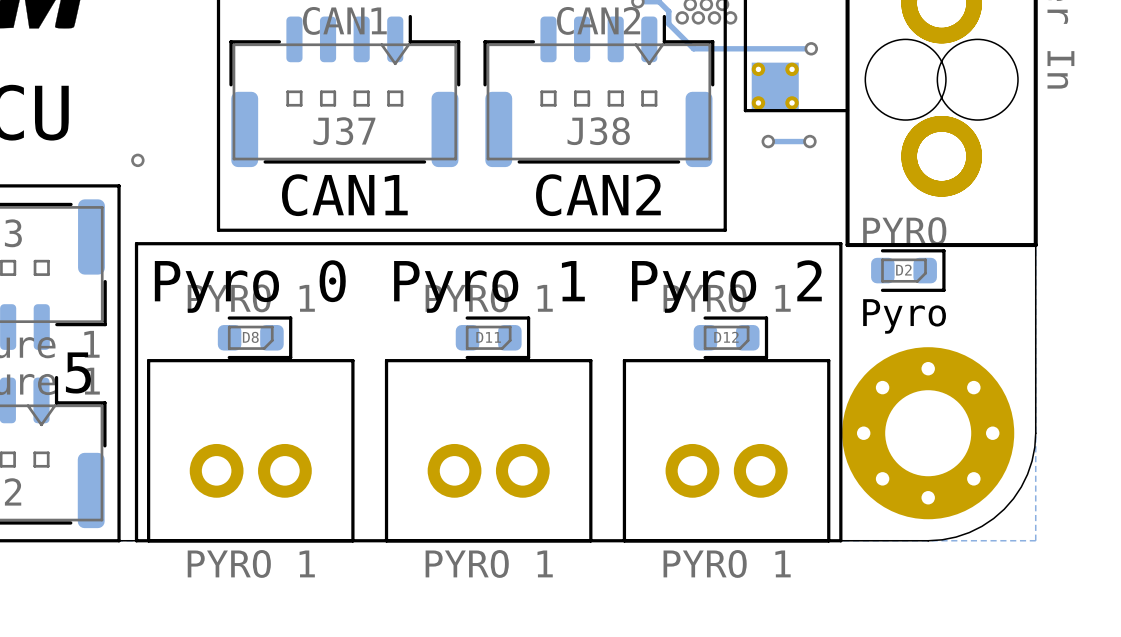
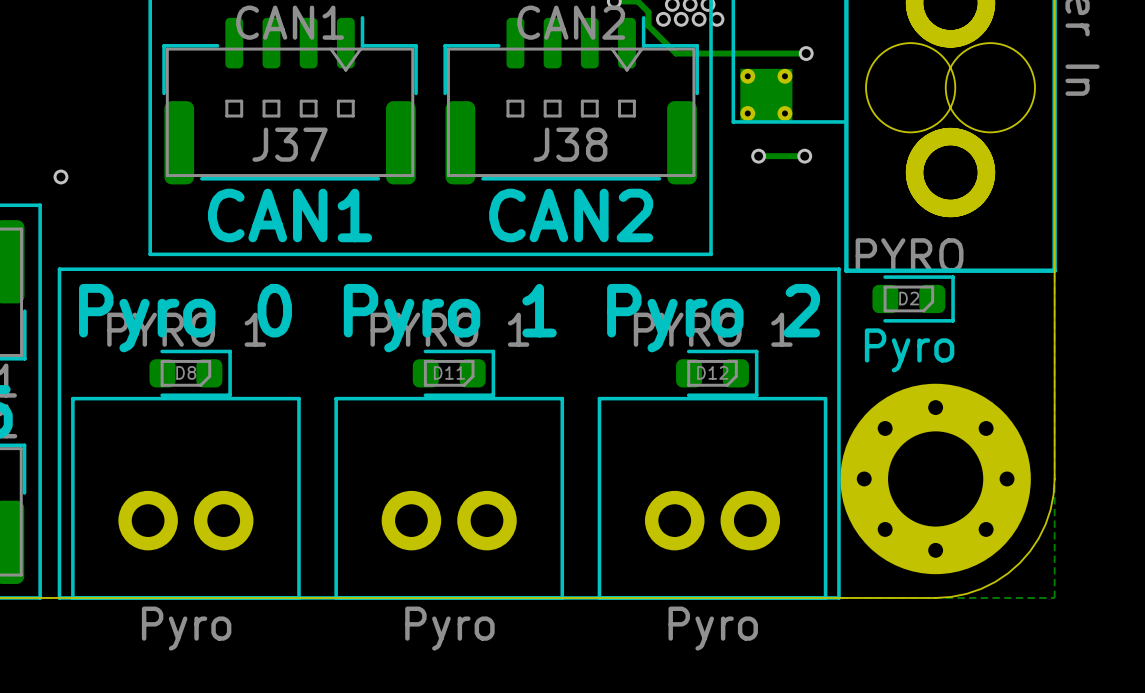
part value: PYRO 1 (251, 563) -> Pyro (186, 628)
part value: PYRO 1 (489, 563) -> Pyro (449, 628)
part value: PYRO 1 (727, 563) -> Pyro (713, 628)

